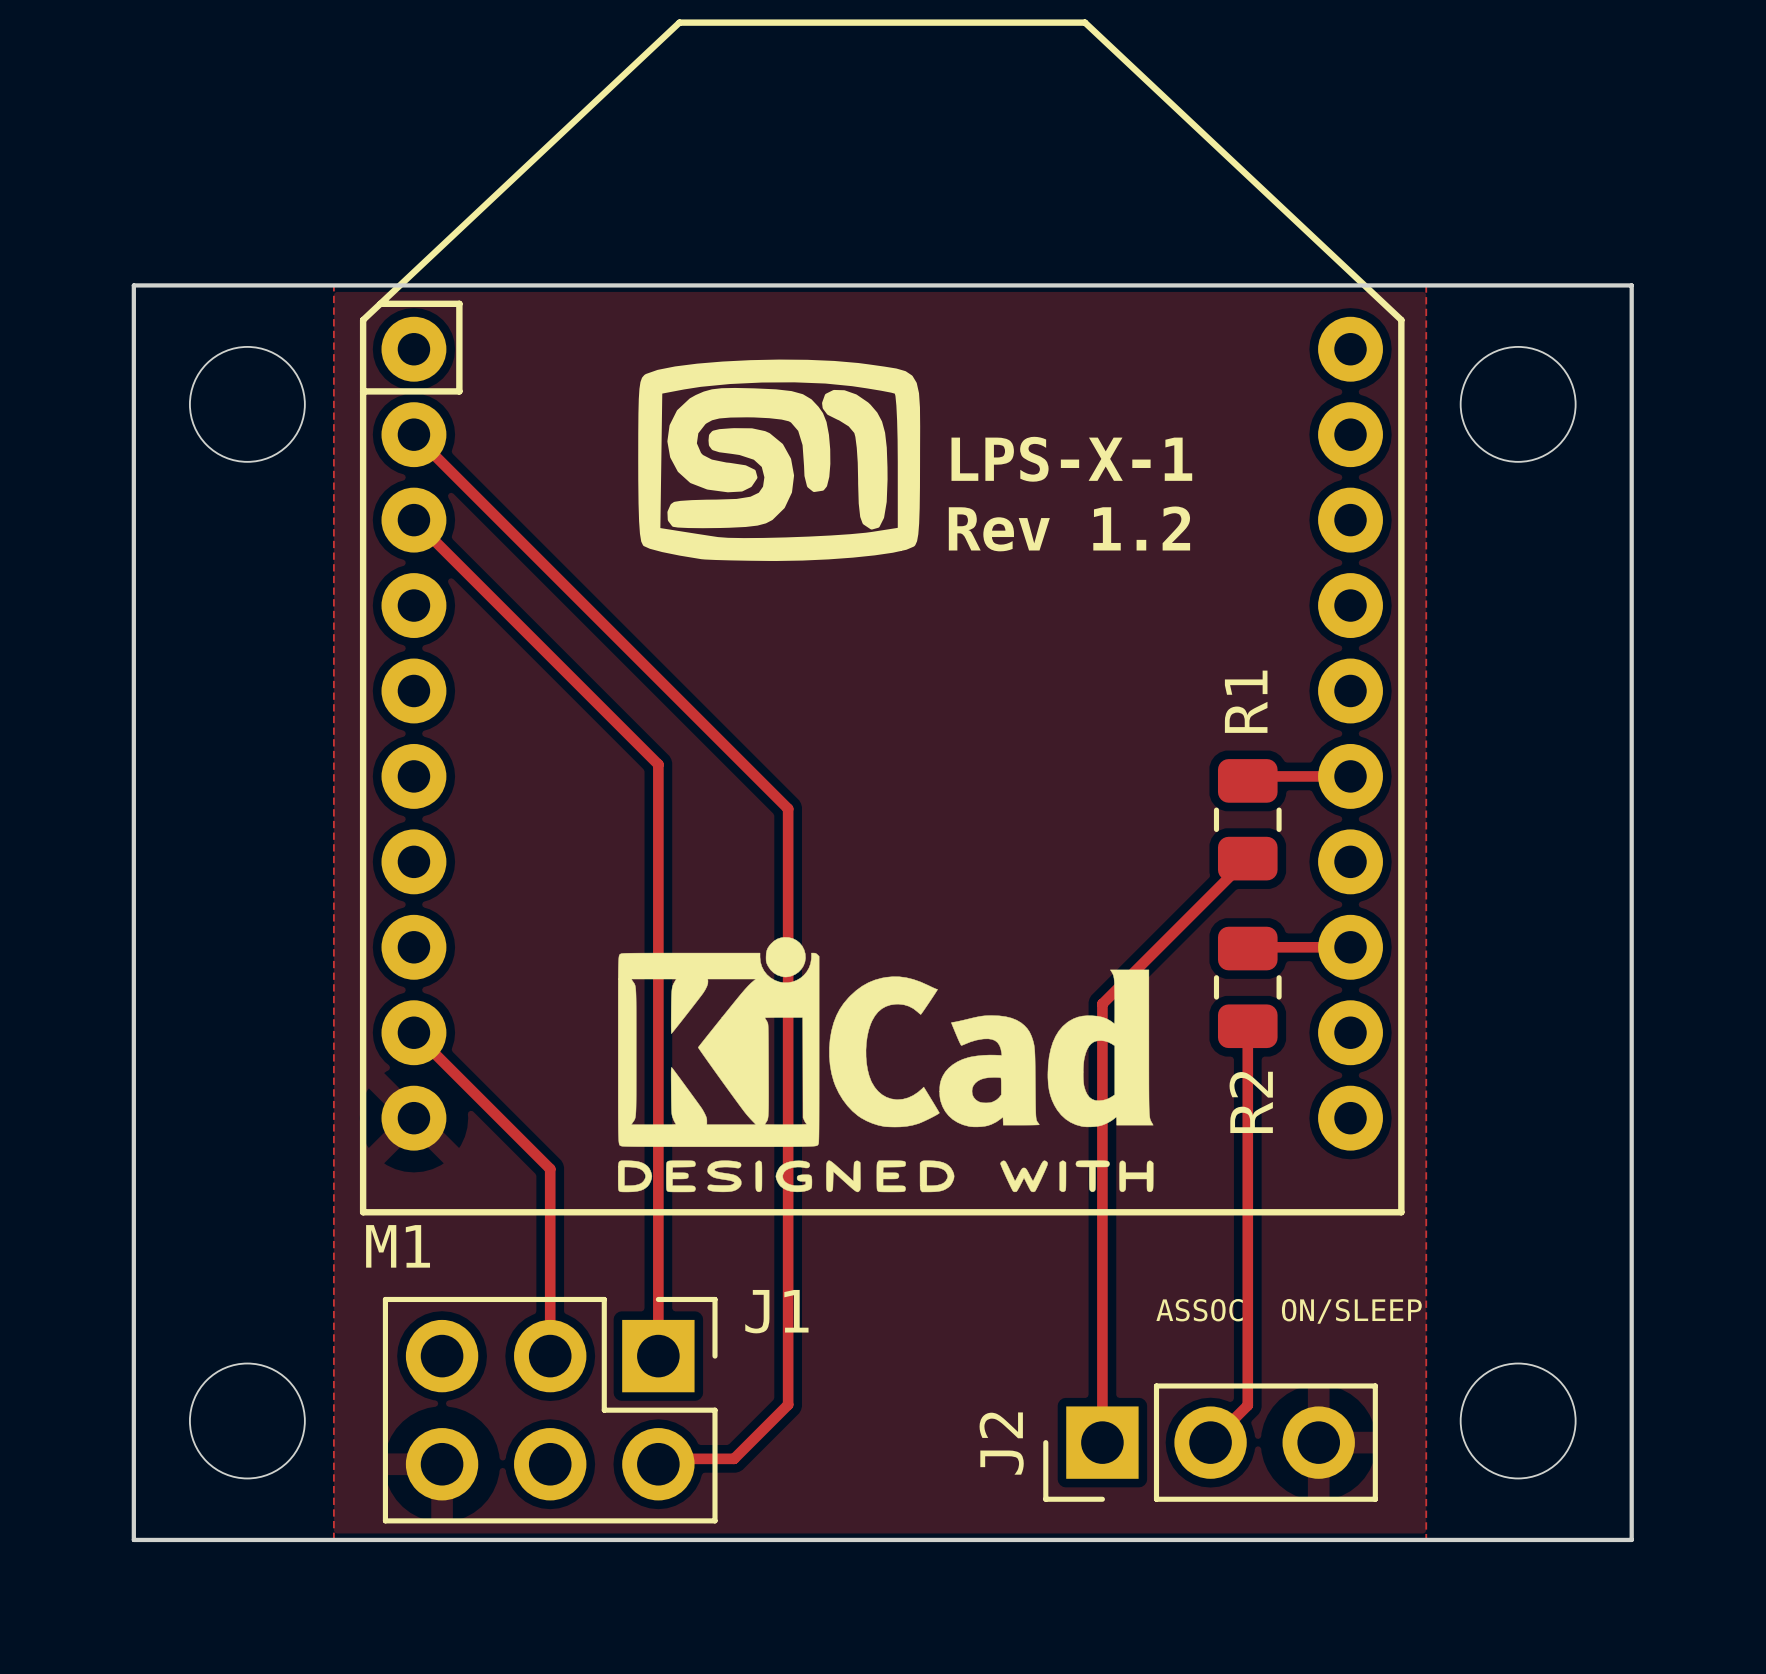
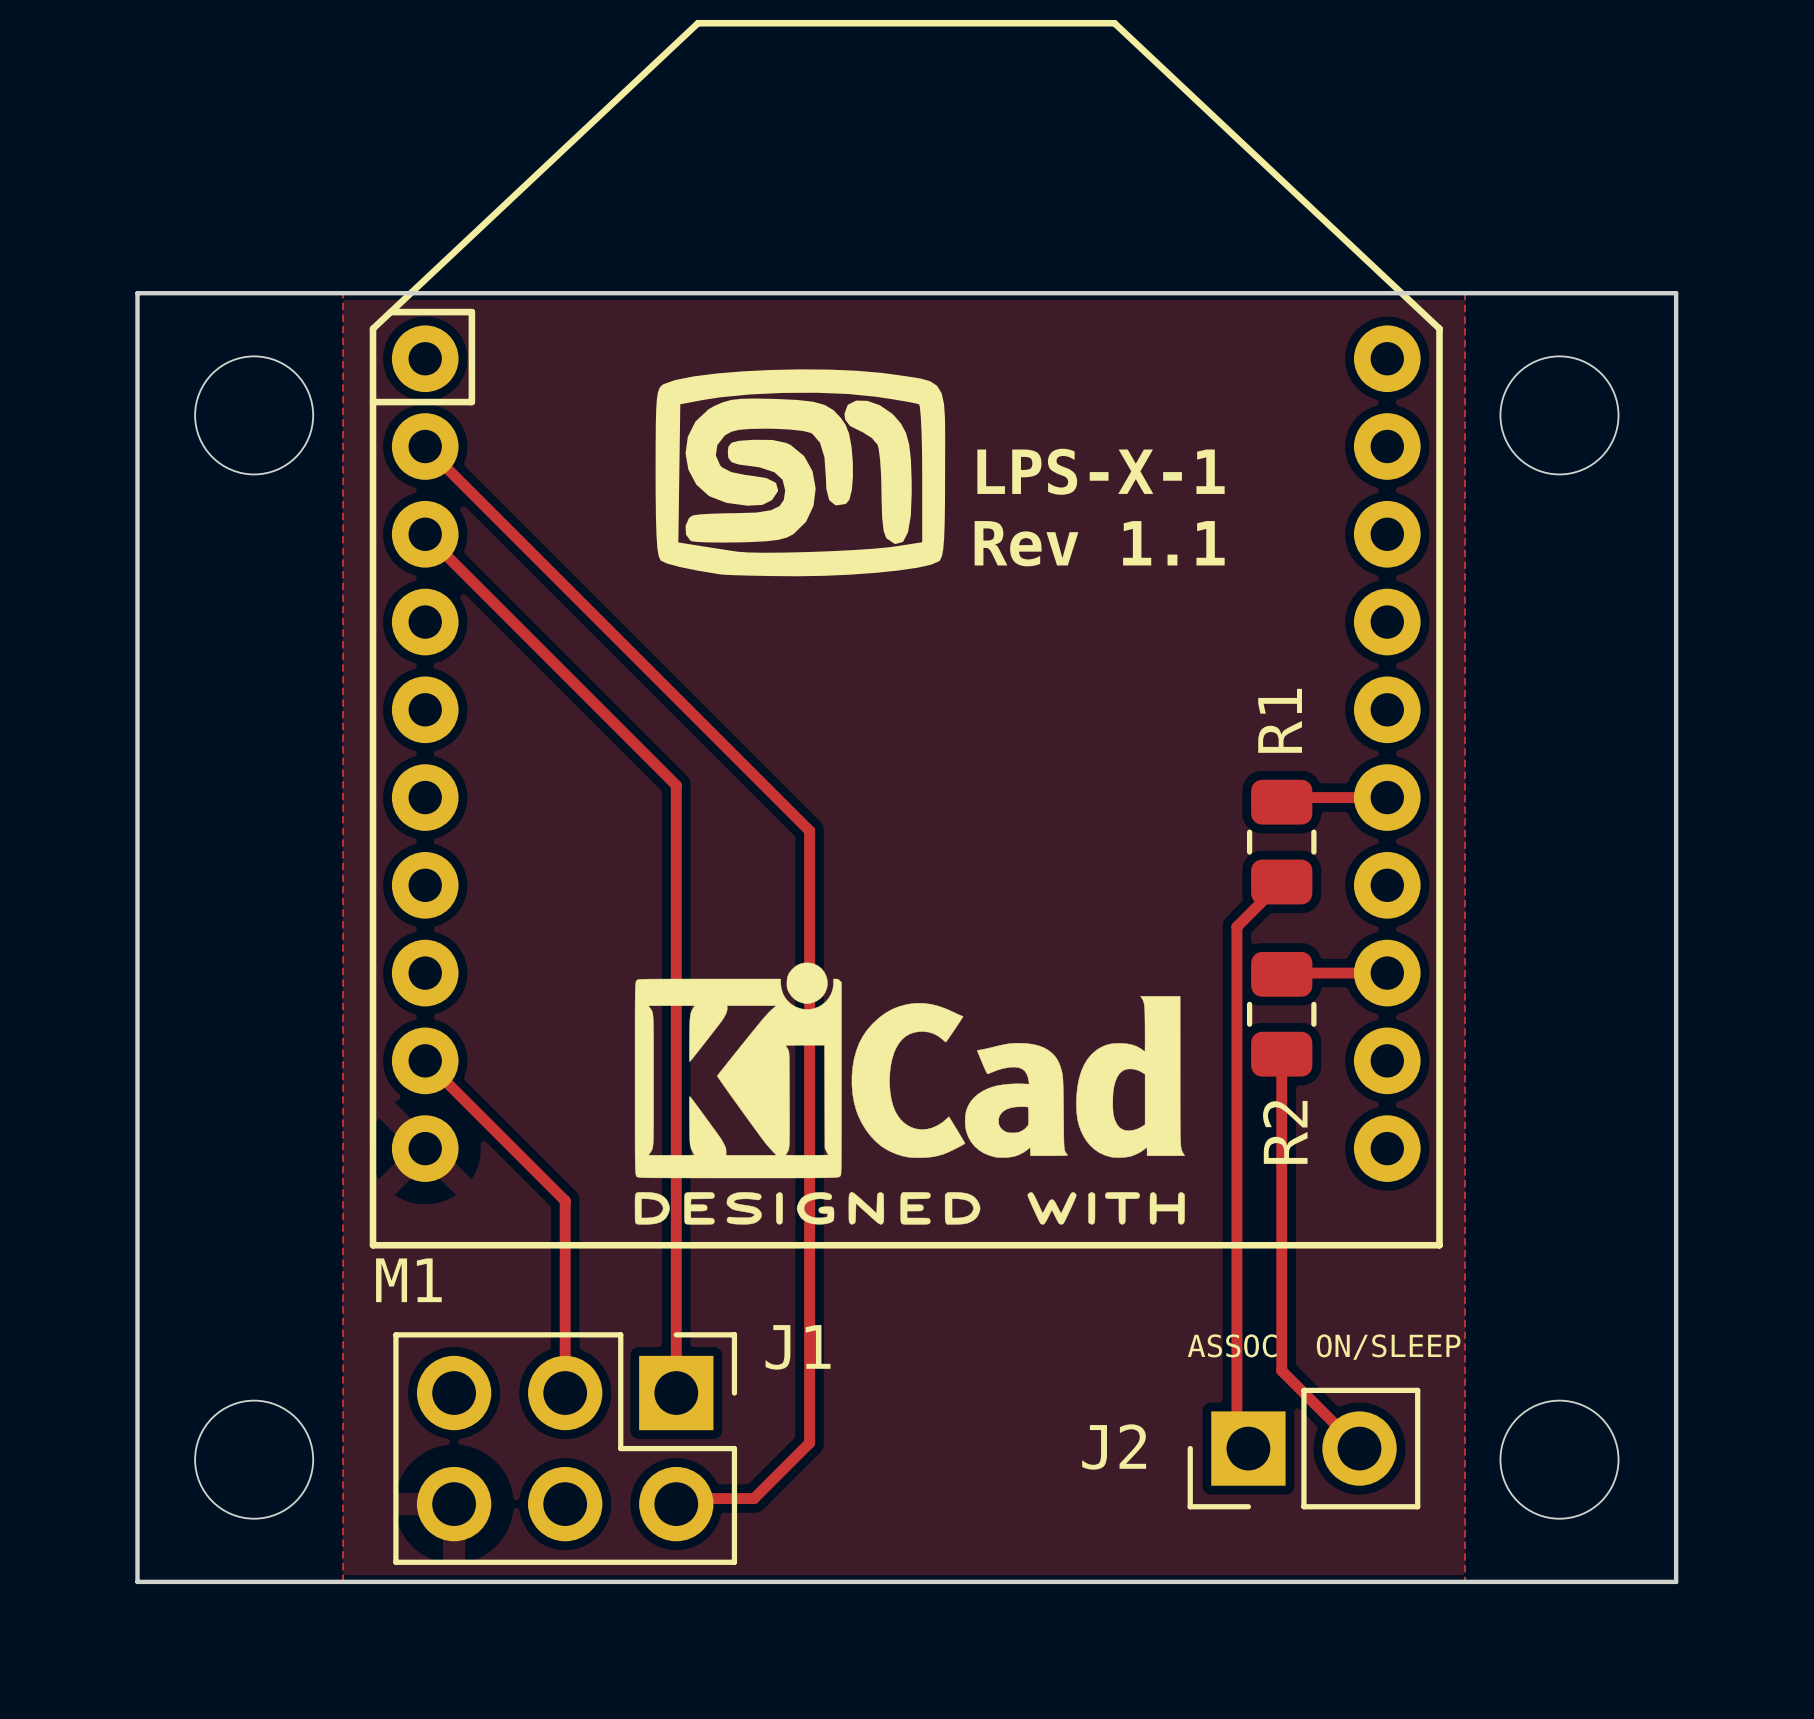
text: Rev 1.2 (1069, 528) -> Rev 1.1 (1099, 543)
track: (1204, 902) (1102, 1003) (1102, 1442) -> (1236, 926) (1236, 1437) (1248, 1448)
track: (1247, 1334) (1247, 1405) (1210, 1442) -> (1281, 1370) (1359, 1448)
J2 footprint: [1043, 1383, 1378, 1502] -> [1187, 1387, 1421, 1510]

